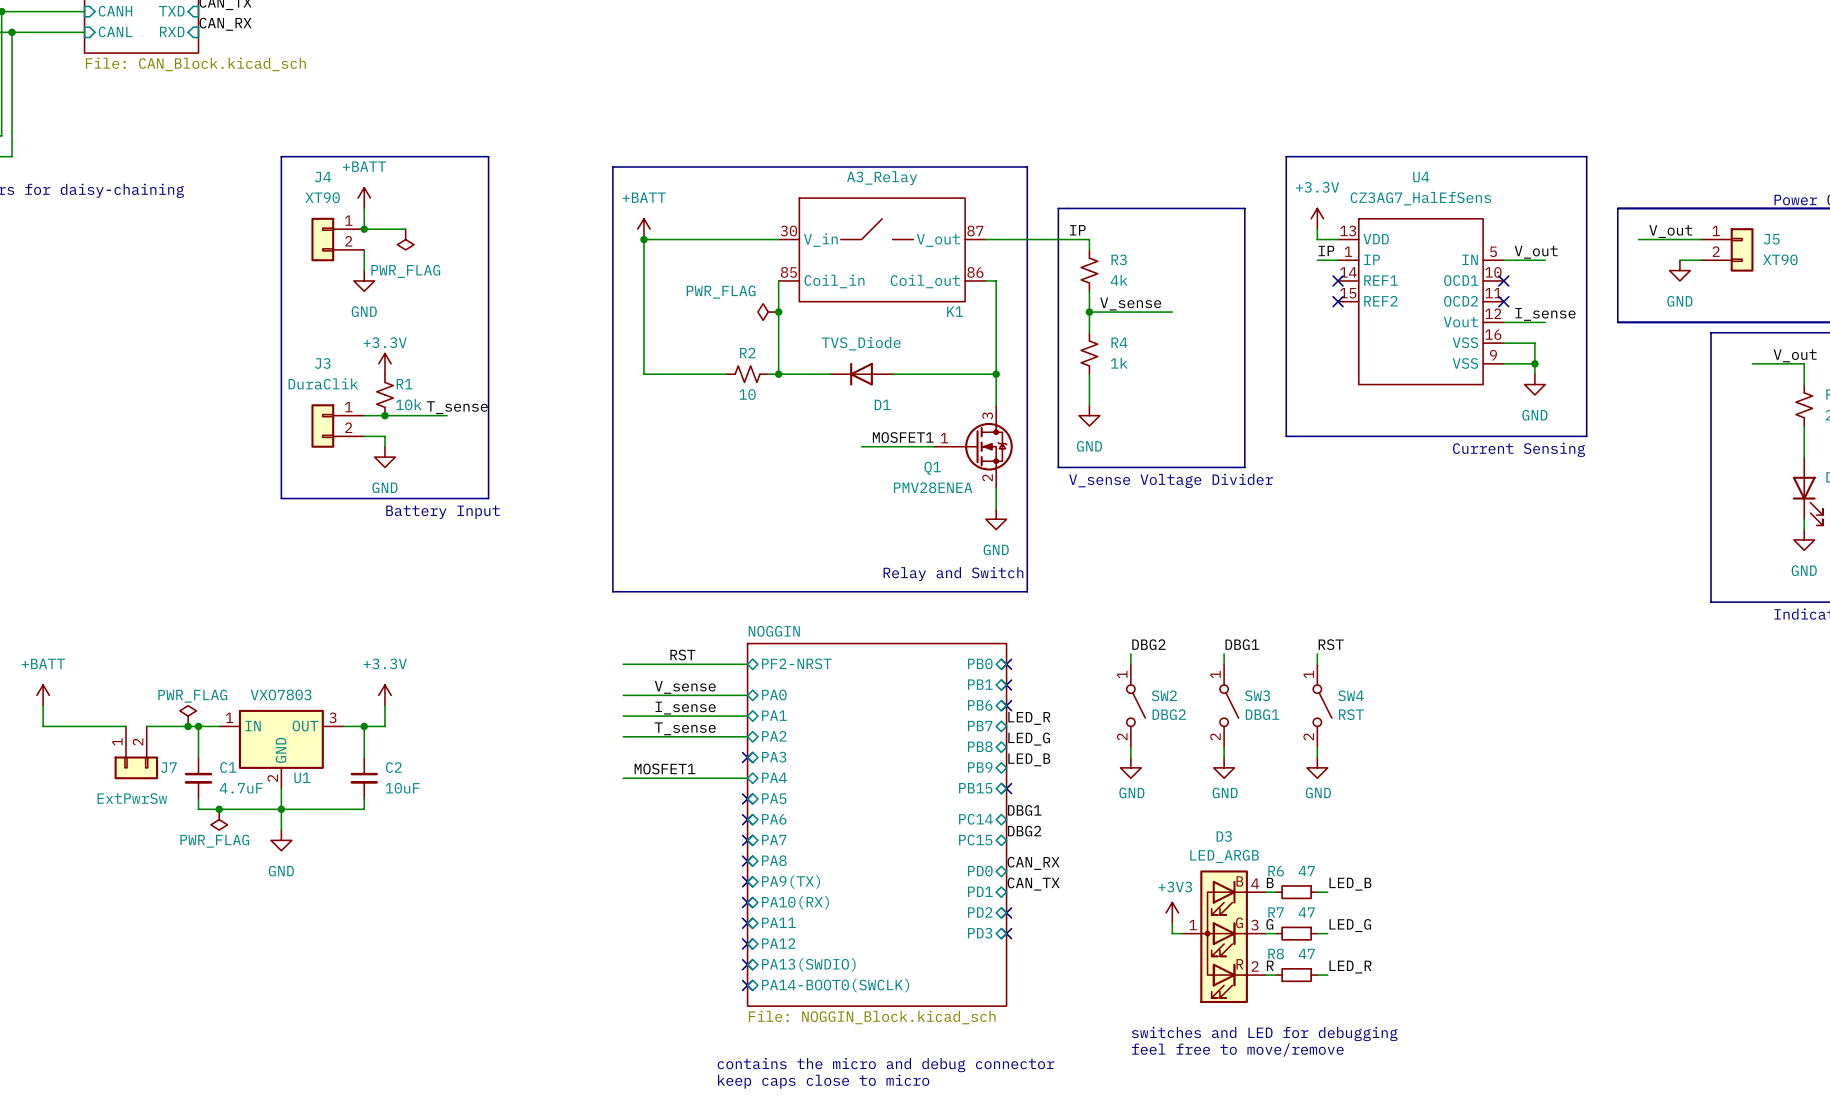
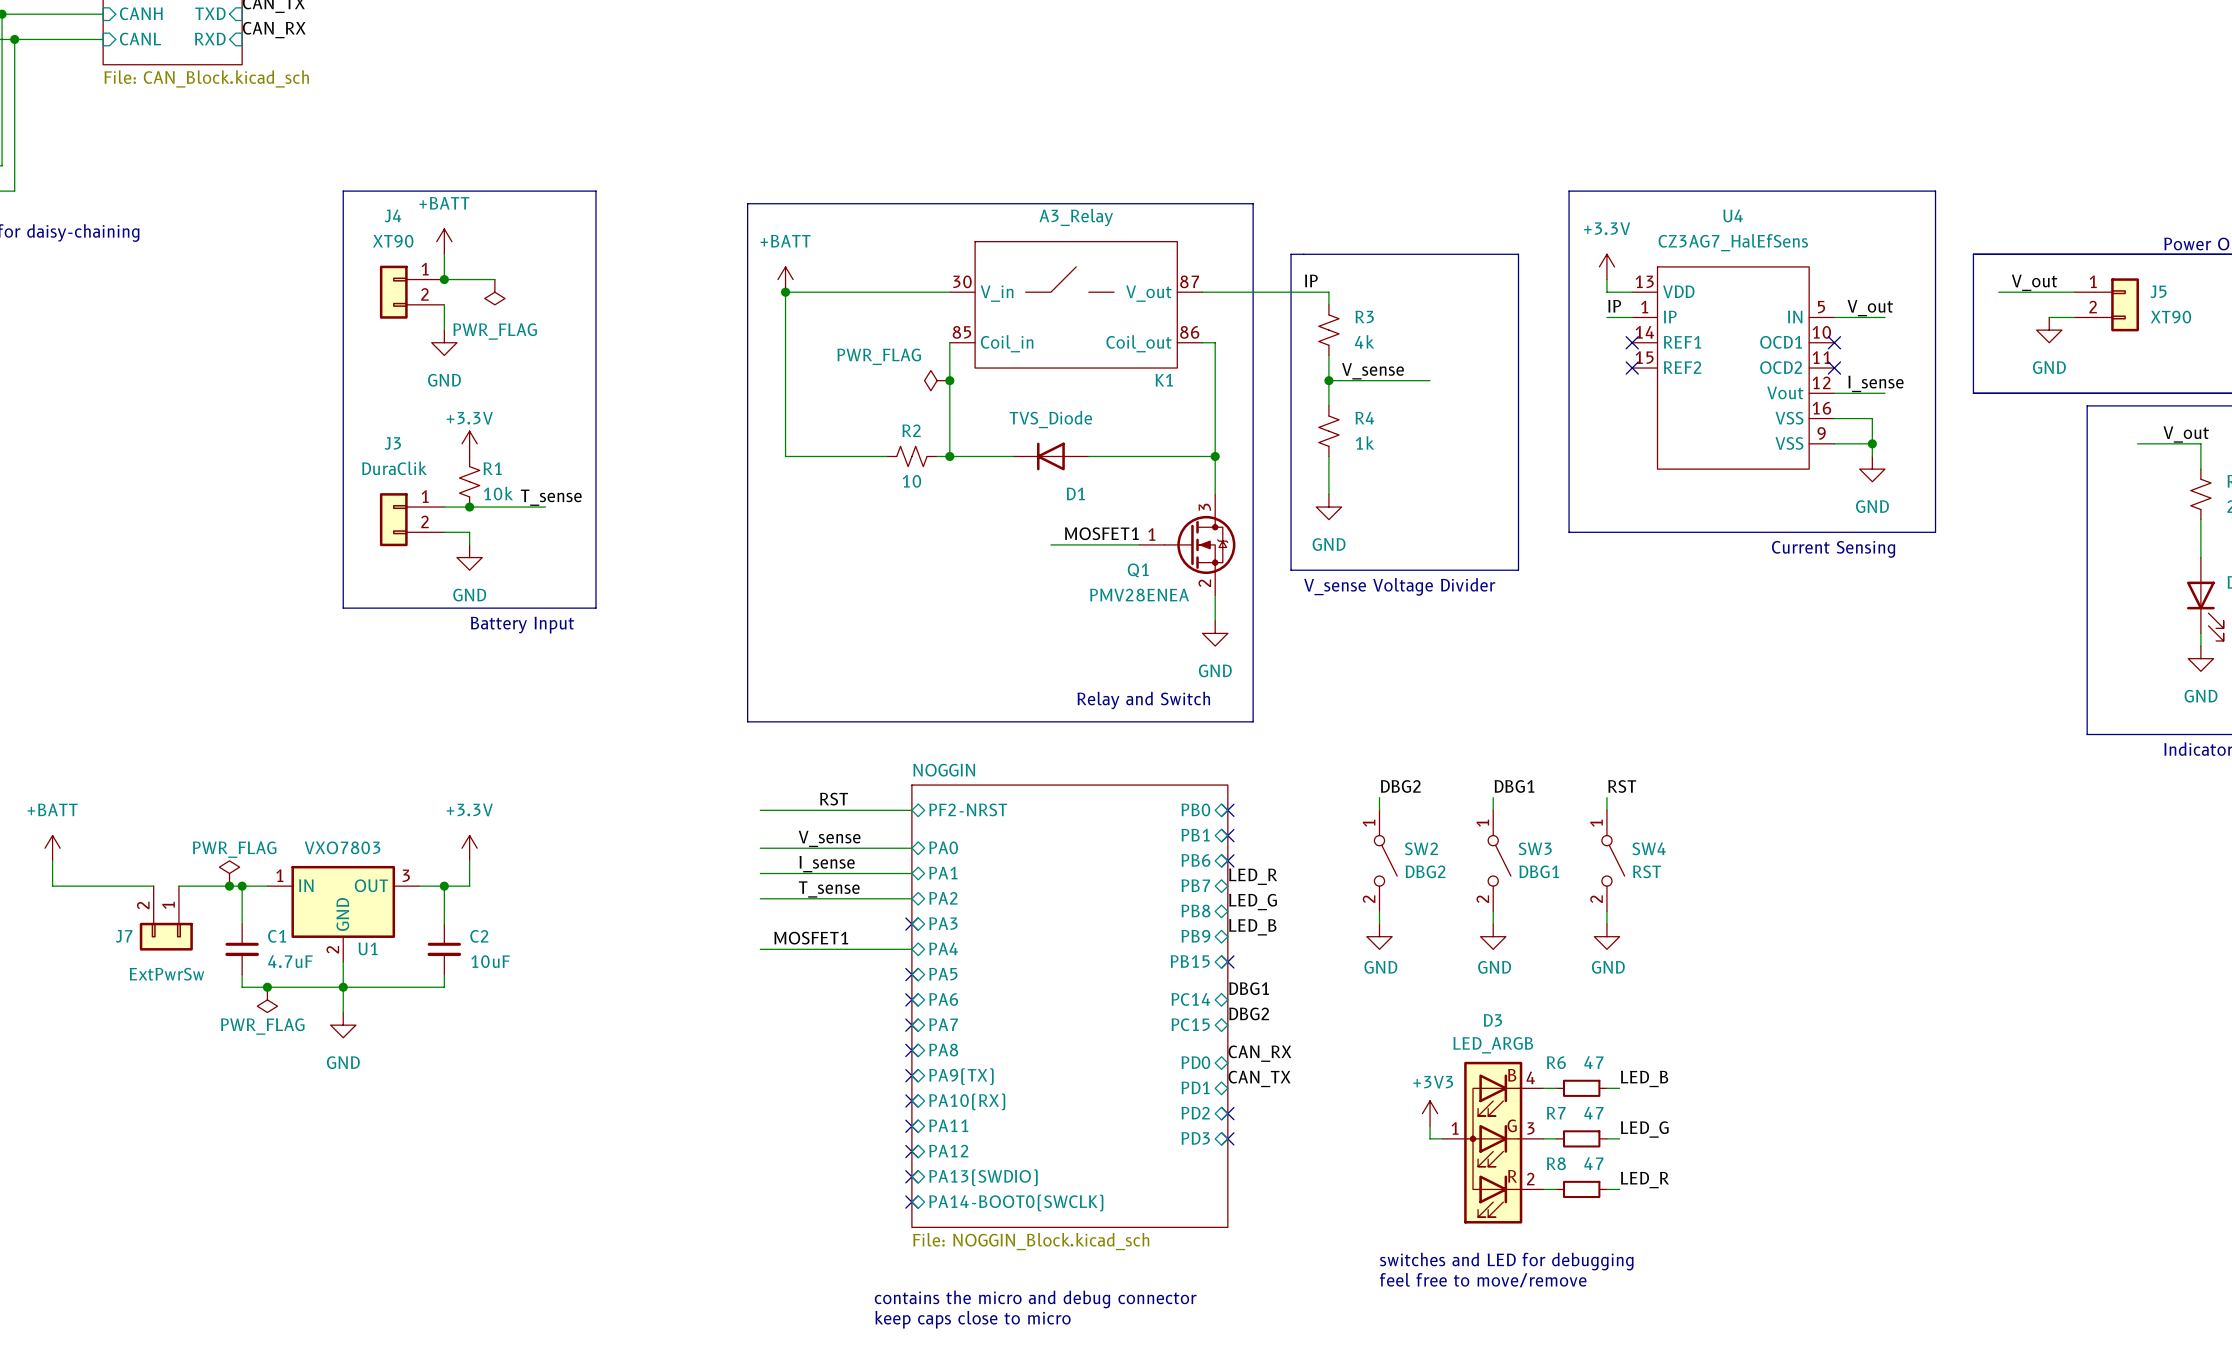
J7 flip: as is (136, 767) -> left-right (166, 936)
label: B (1270, 882) -> none
label: G (1269, 924) -> none
label: R (1270, 965) -> none

